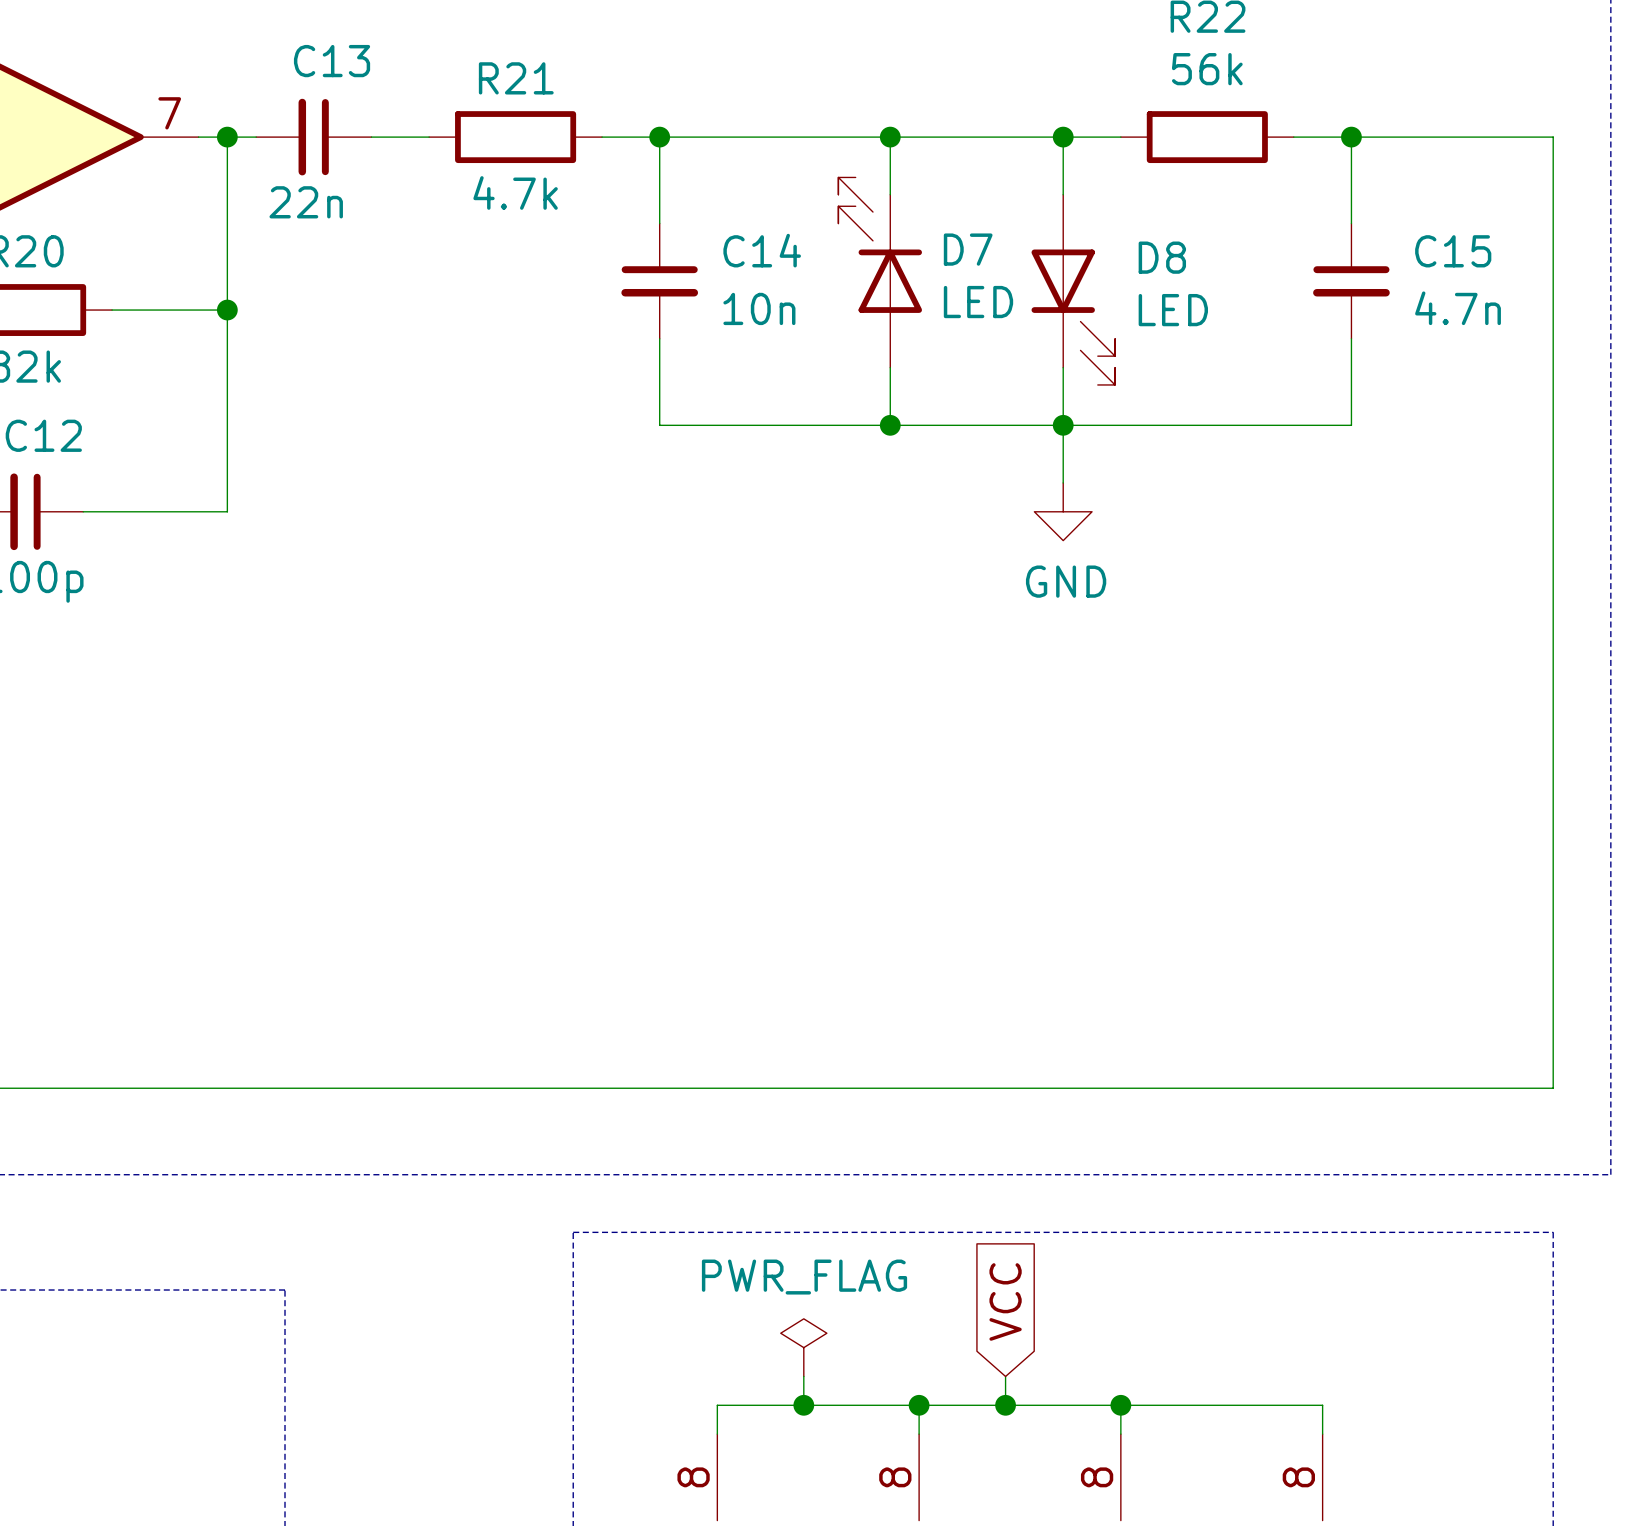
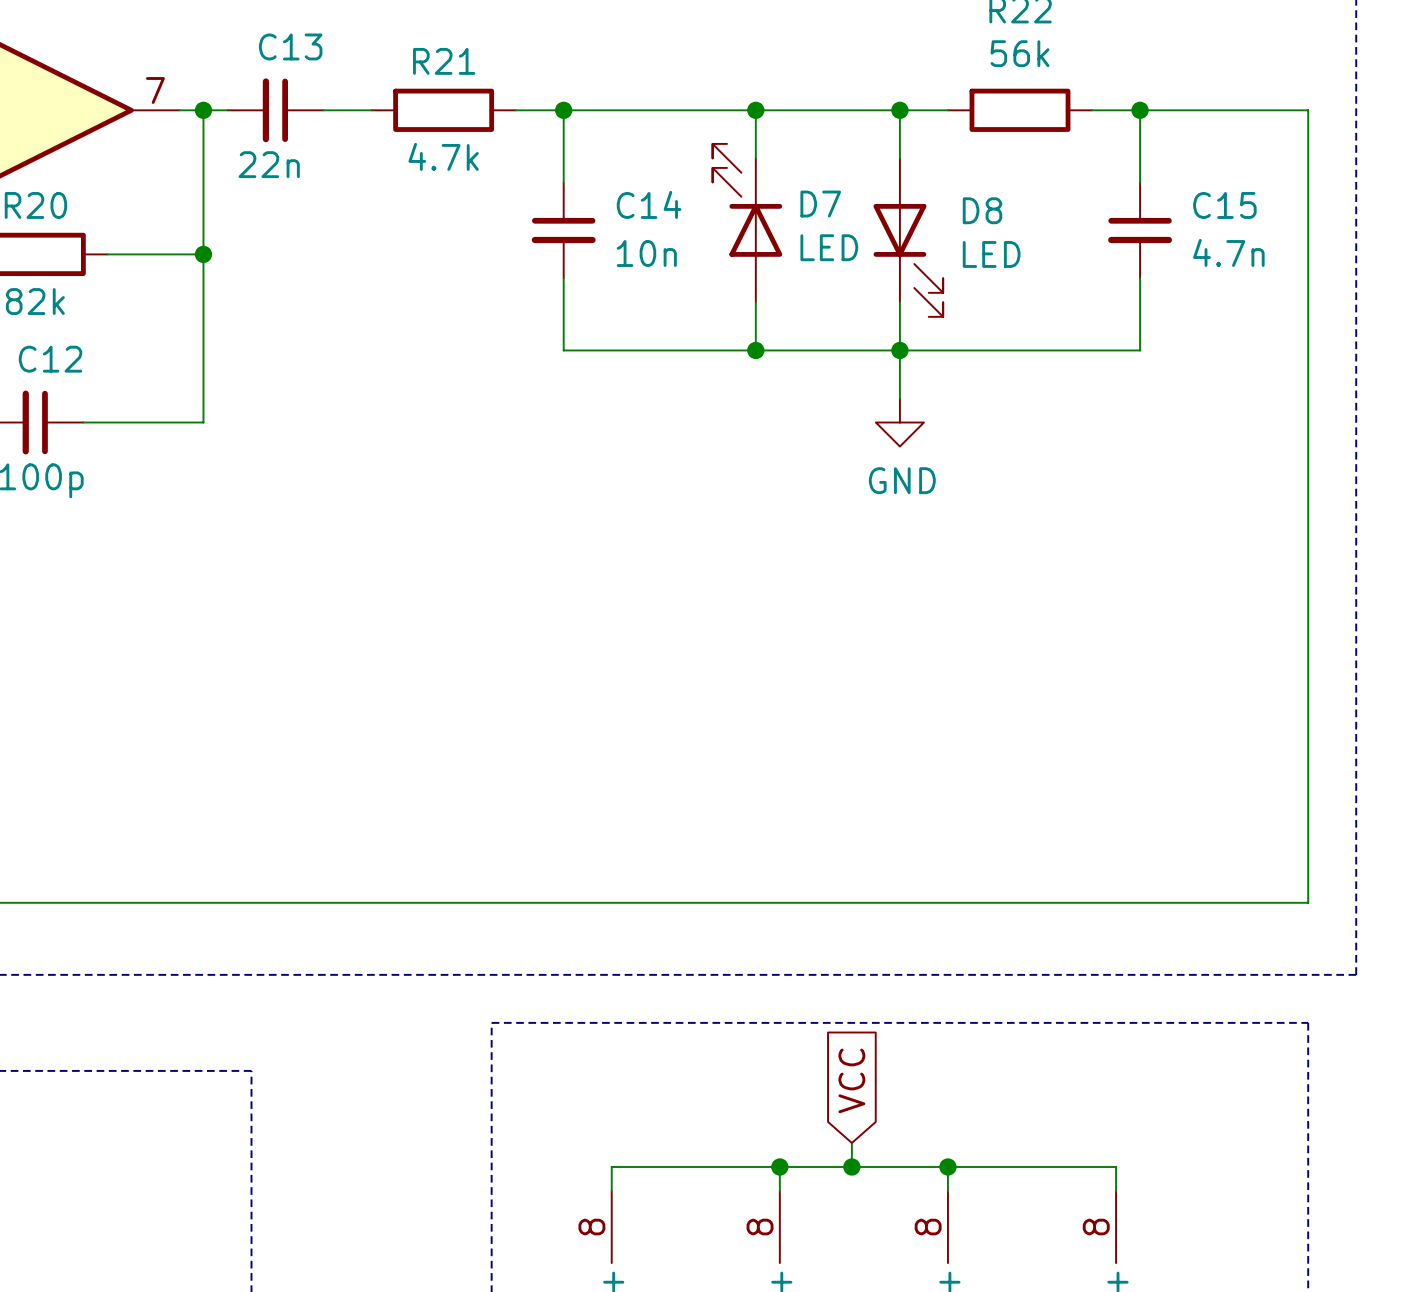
power symbol: PWR_FLAG (803, 1347) -> none
wire: (803, 1376) (803, 1405) -> none
junction: (803, 1405) -> none

